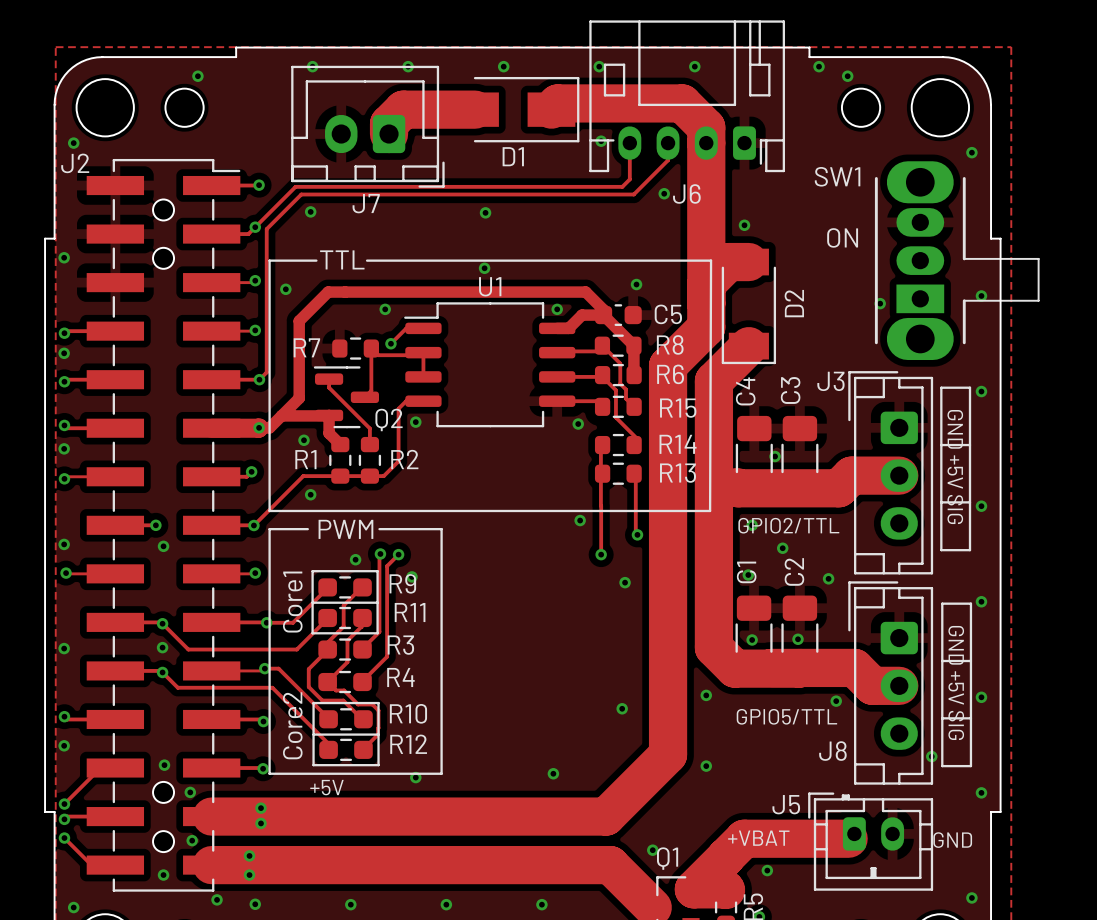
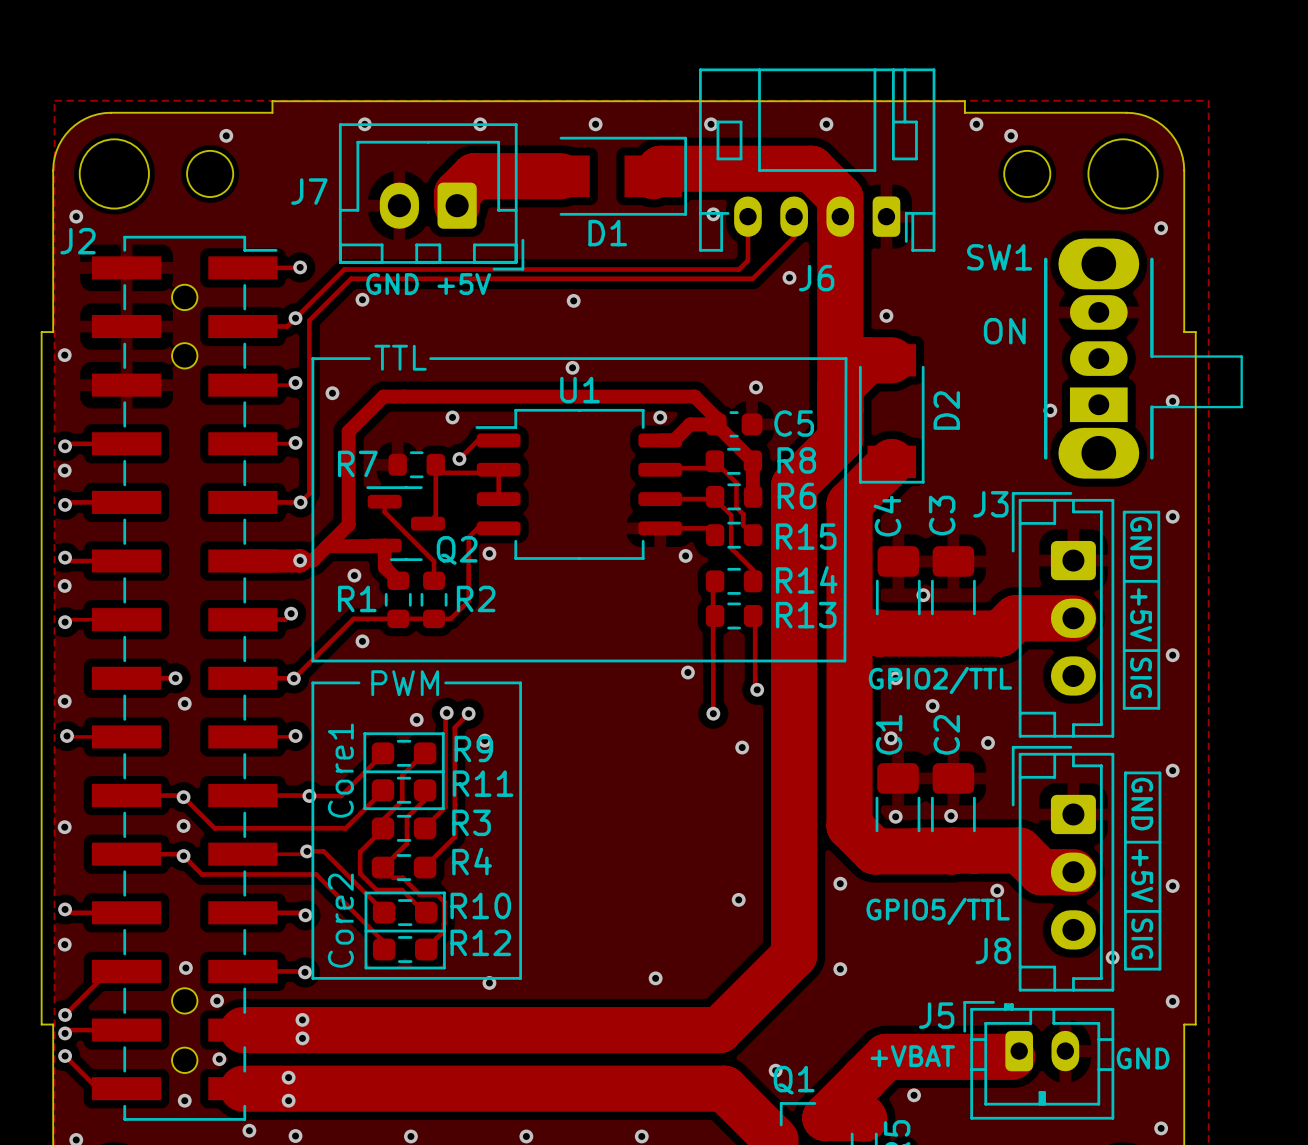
text: none -> GND (392, 284)
text: none -> +5V (464, 284)
J7 name position: J7 (366, 203) -> J7 (309, 191)
text: +5V (326, 787) -> none

